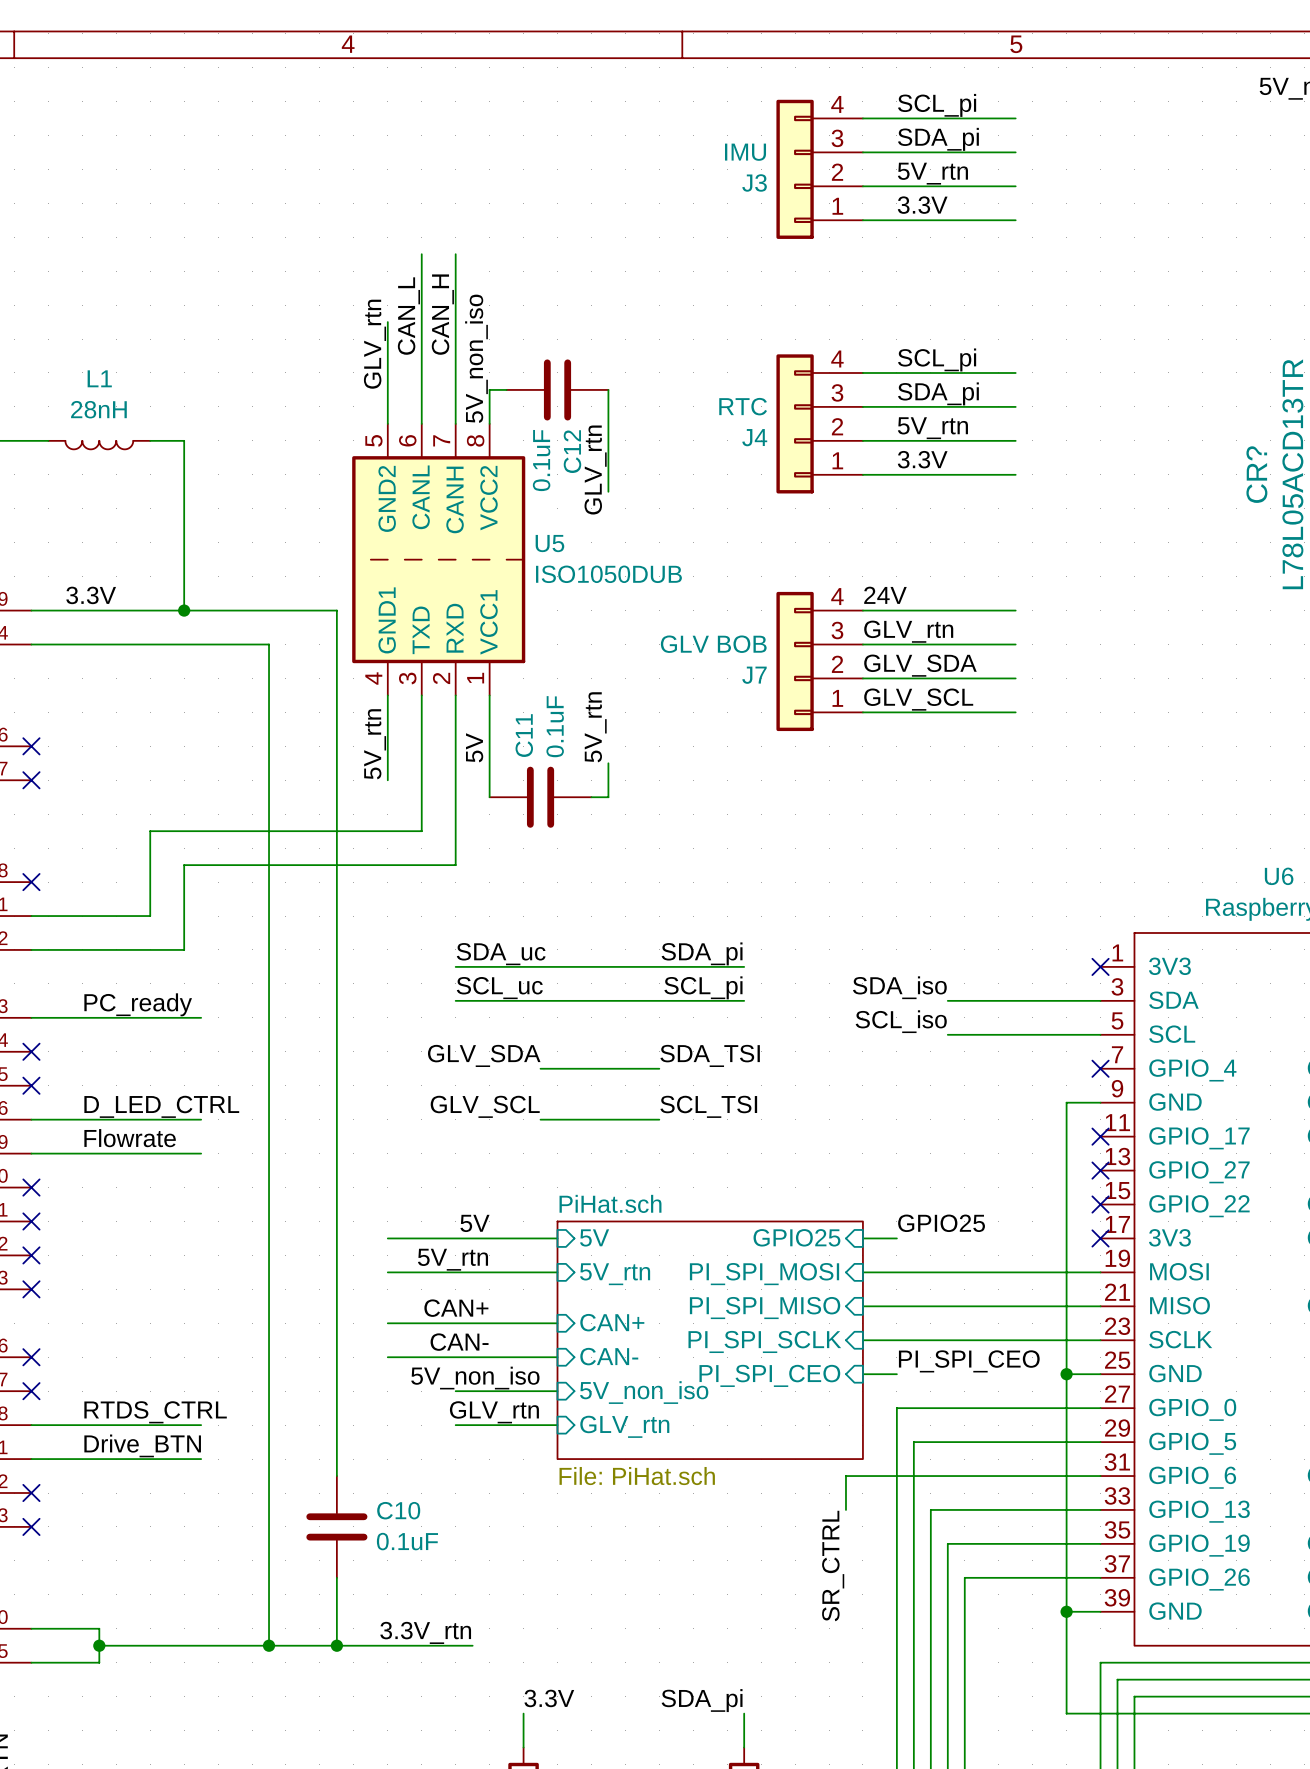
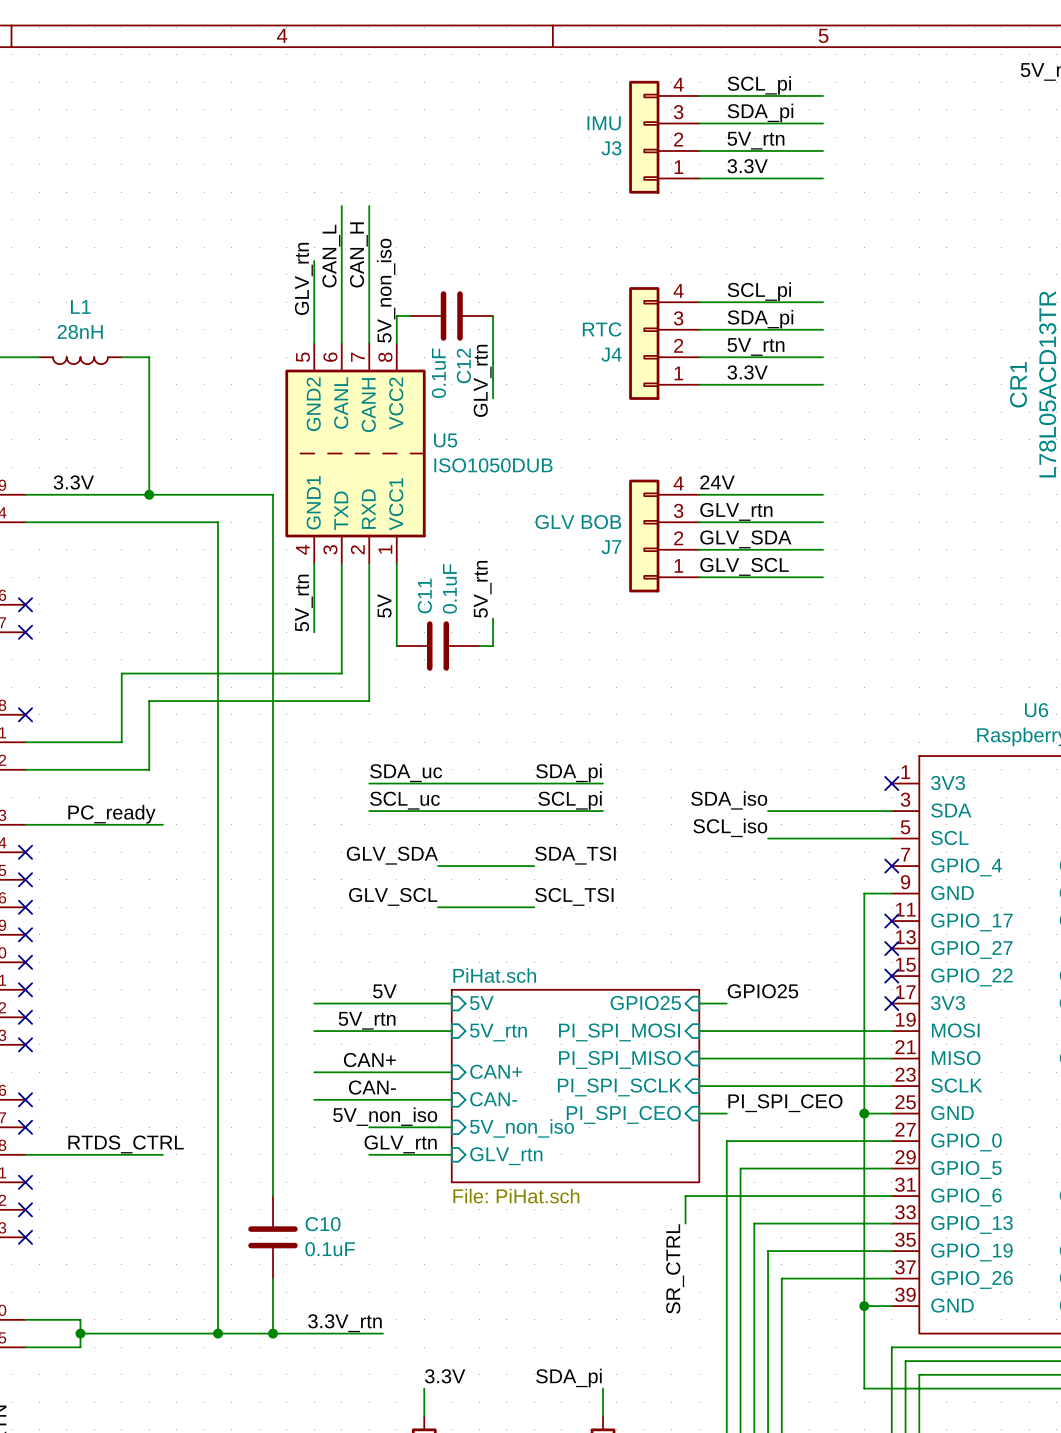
CR? name: CR? (1256, 474) -> CR1 (1018, 384)
label: D_LED_CTRL (161, 1106) -> none
wire: (31, 1119) (201, 1119) -> none
no-connect mark: none -> (25, 907)
label: Flowrate (130, 1138) -> none
wire: (31, 1153) (201, 1153) -> none
no-connect mark: none -> (25, 934)
label: Drive_BTN (142, 1445) -> none
wire: (31, 1459) (201, 1459) -> none
no-connect mark: none -> (25, 1182)

